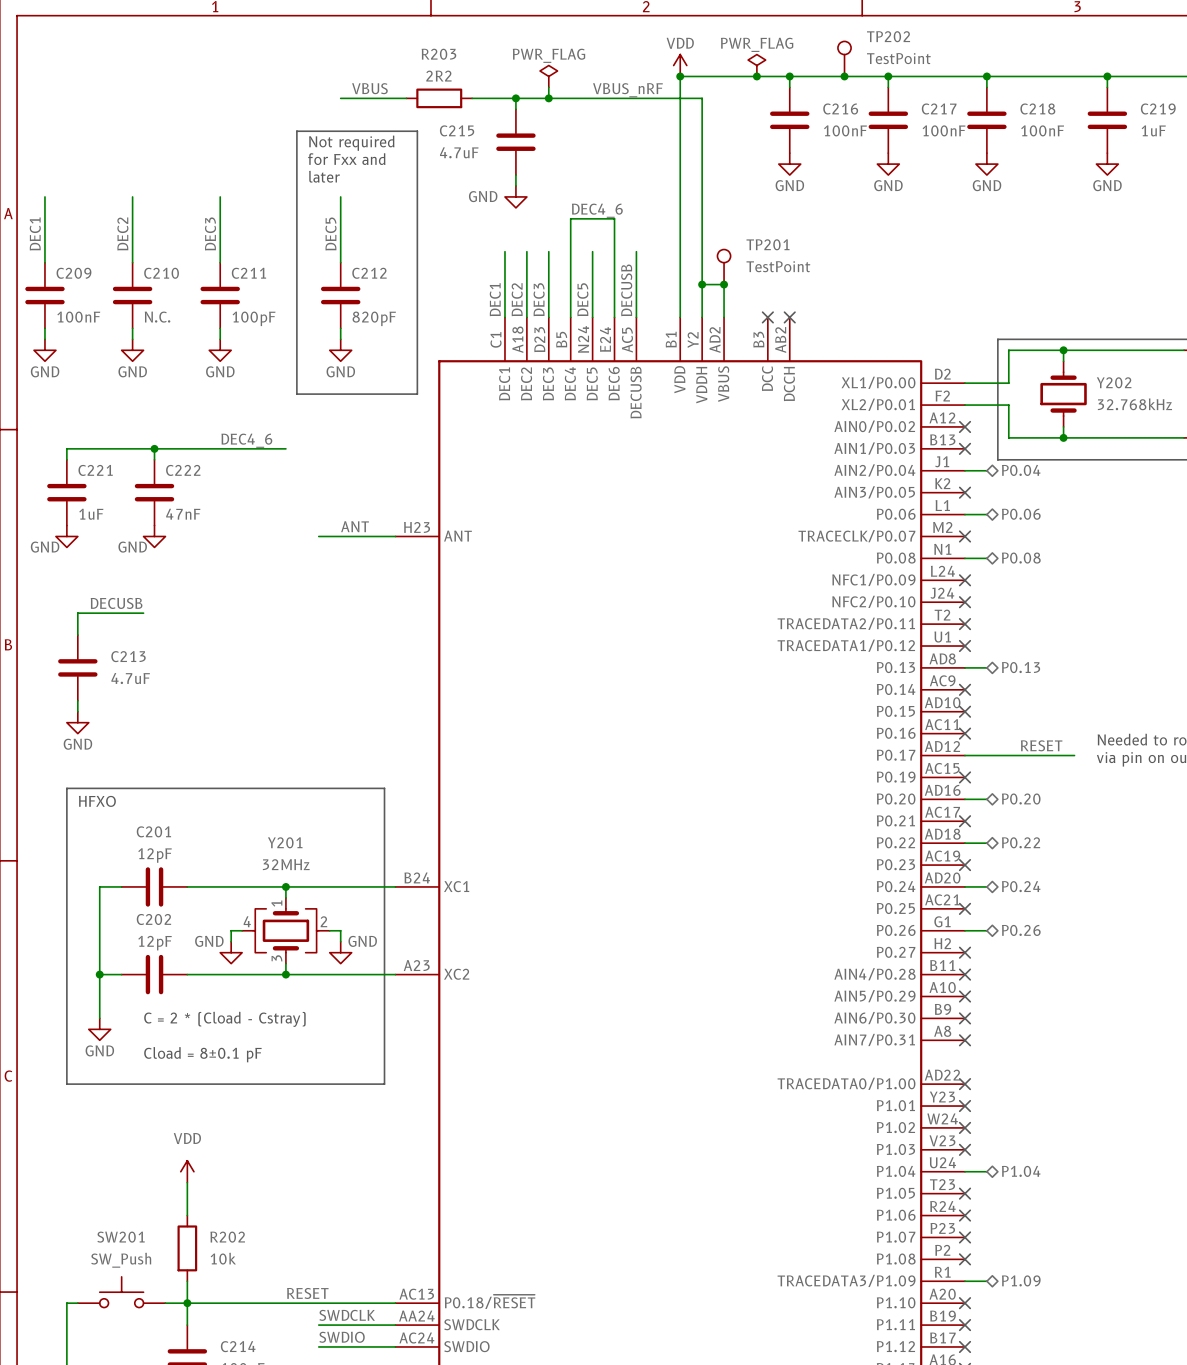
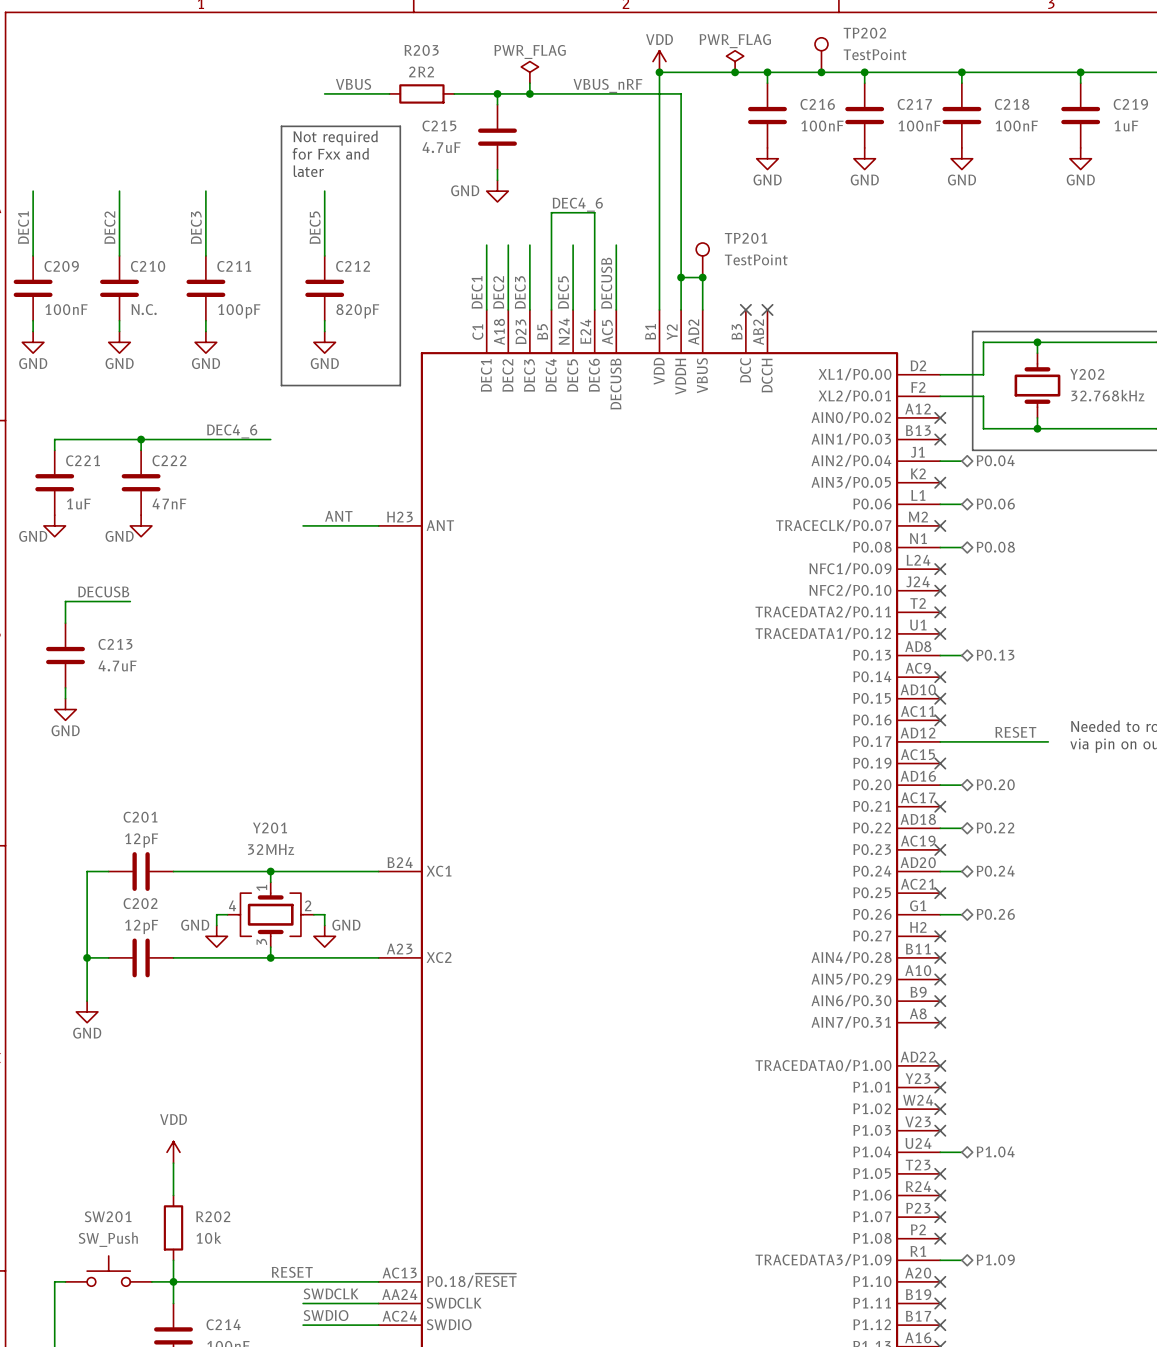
line: (66, 788) (384, 788) (384, 1084) (66, 1084) (66, 788) -> none
text: HFXO (97, 801) -> none
text: C = 2 * (Cload - Cstray) (224, 1019) -> none
text: Cload = 8±0.1 pF (202, 1054) -> none

